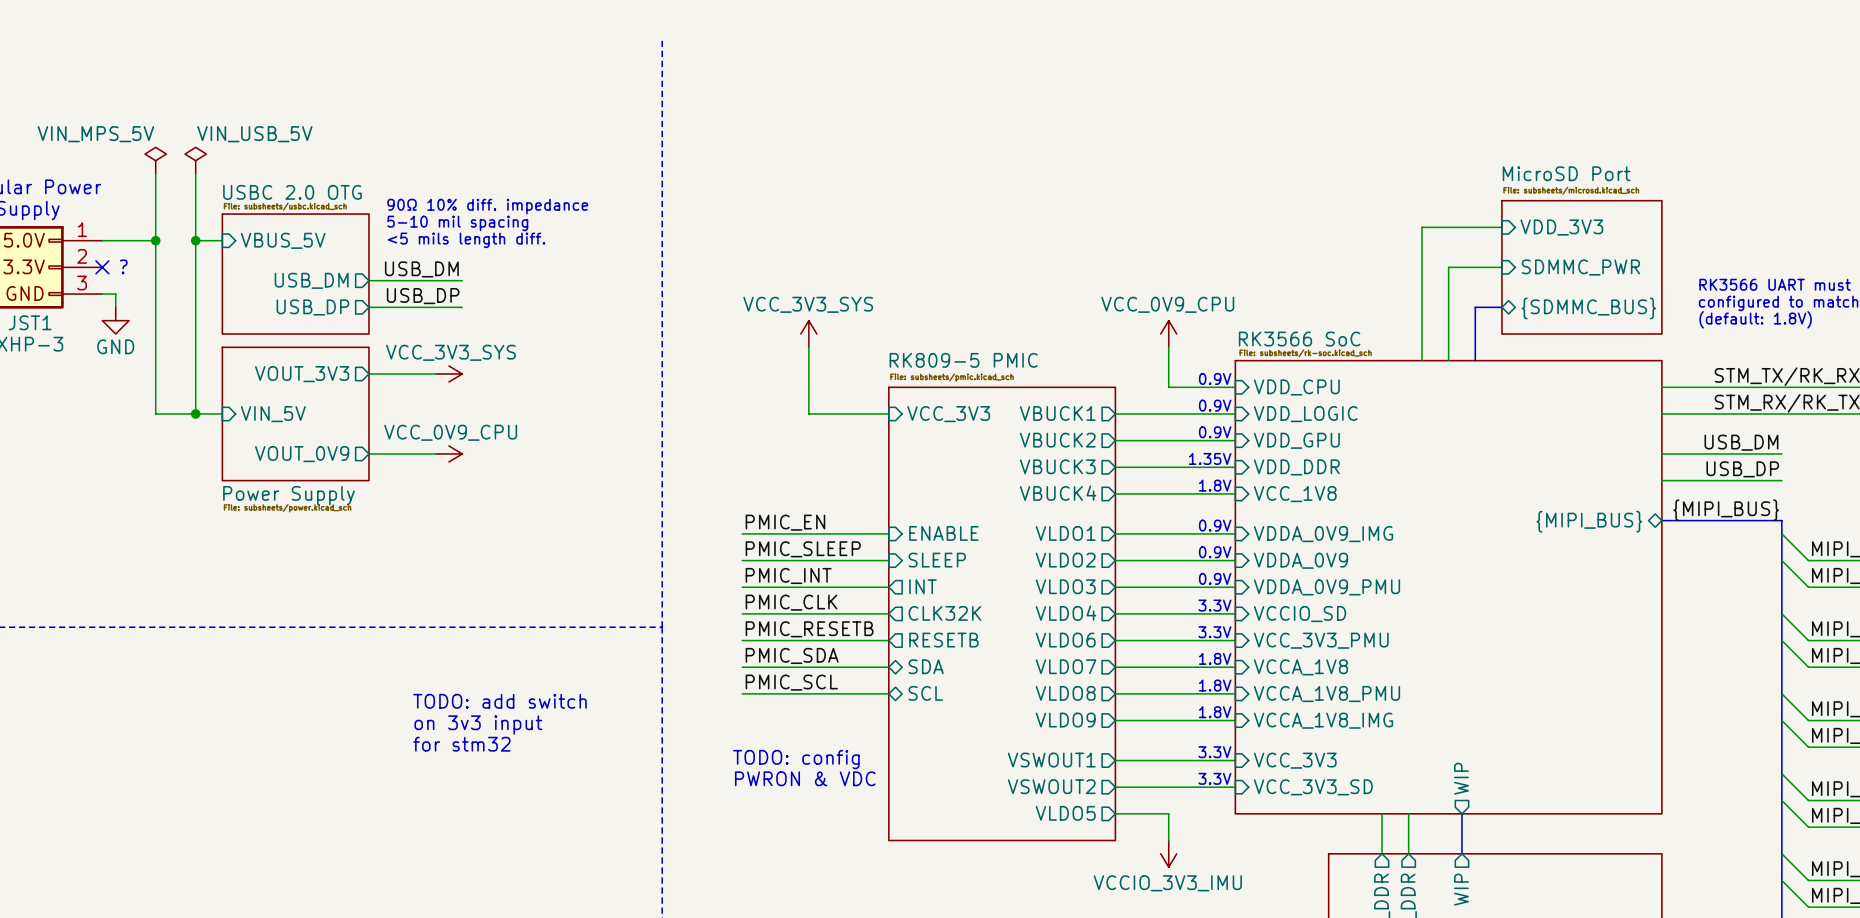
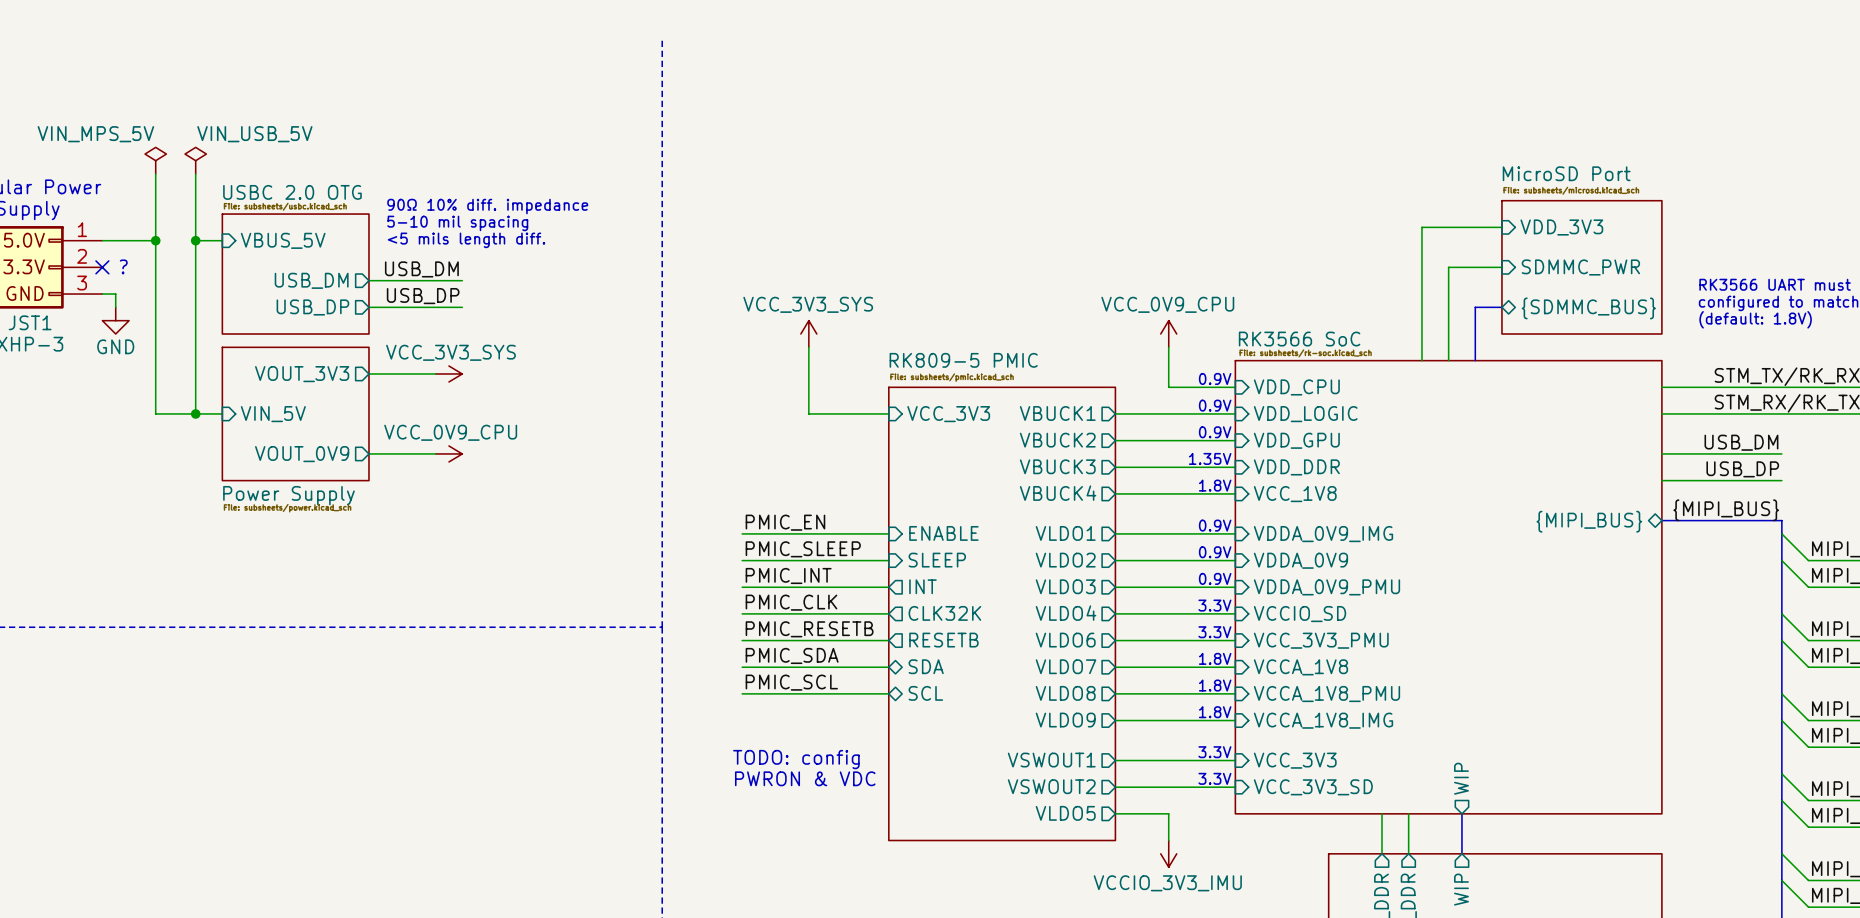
text: TODO: add switch (499, 701) -> none
text: on 3v3 input (478, 724) -> none
text: for stm32 (461, 744) -> none

